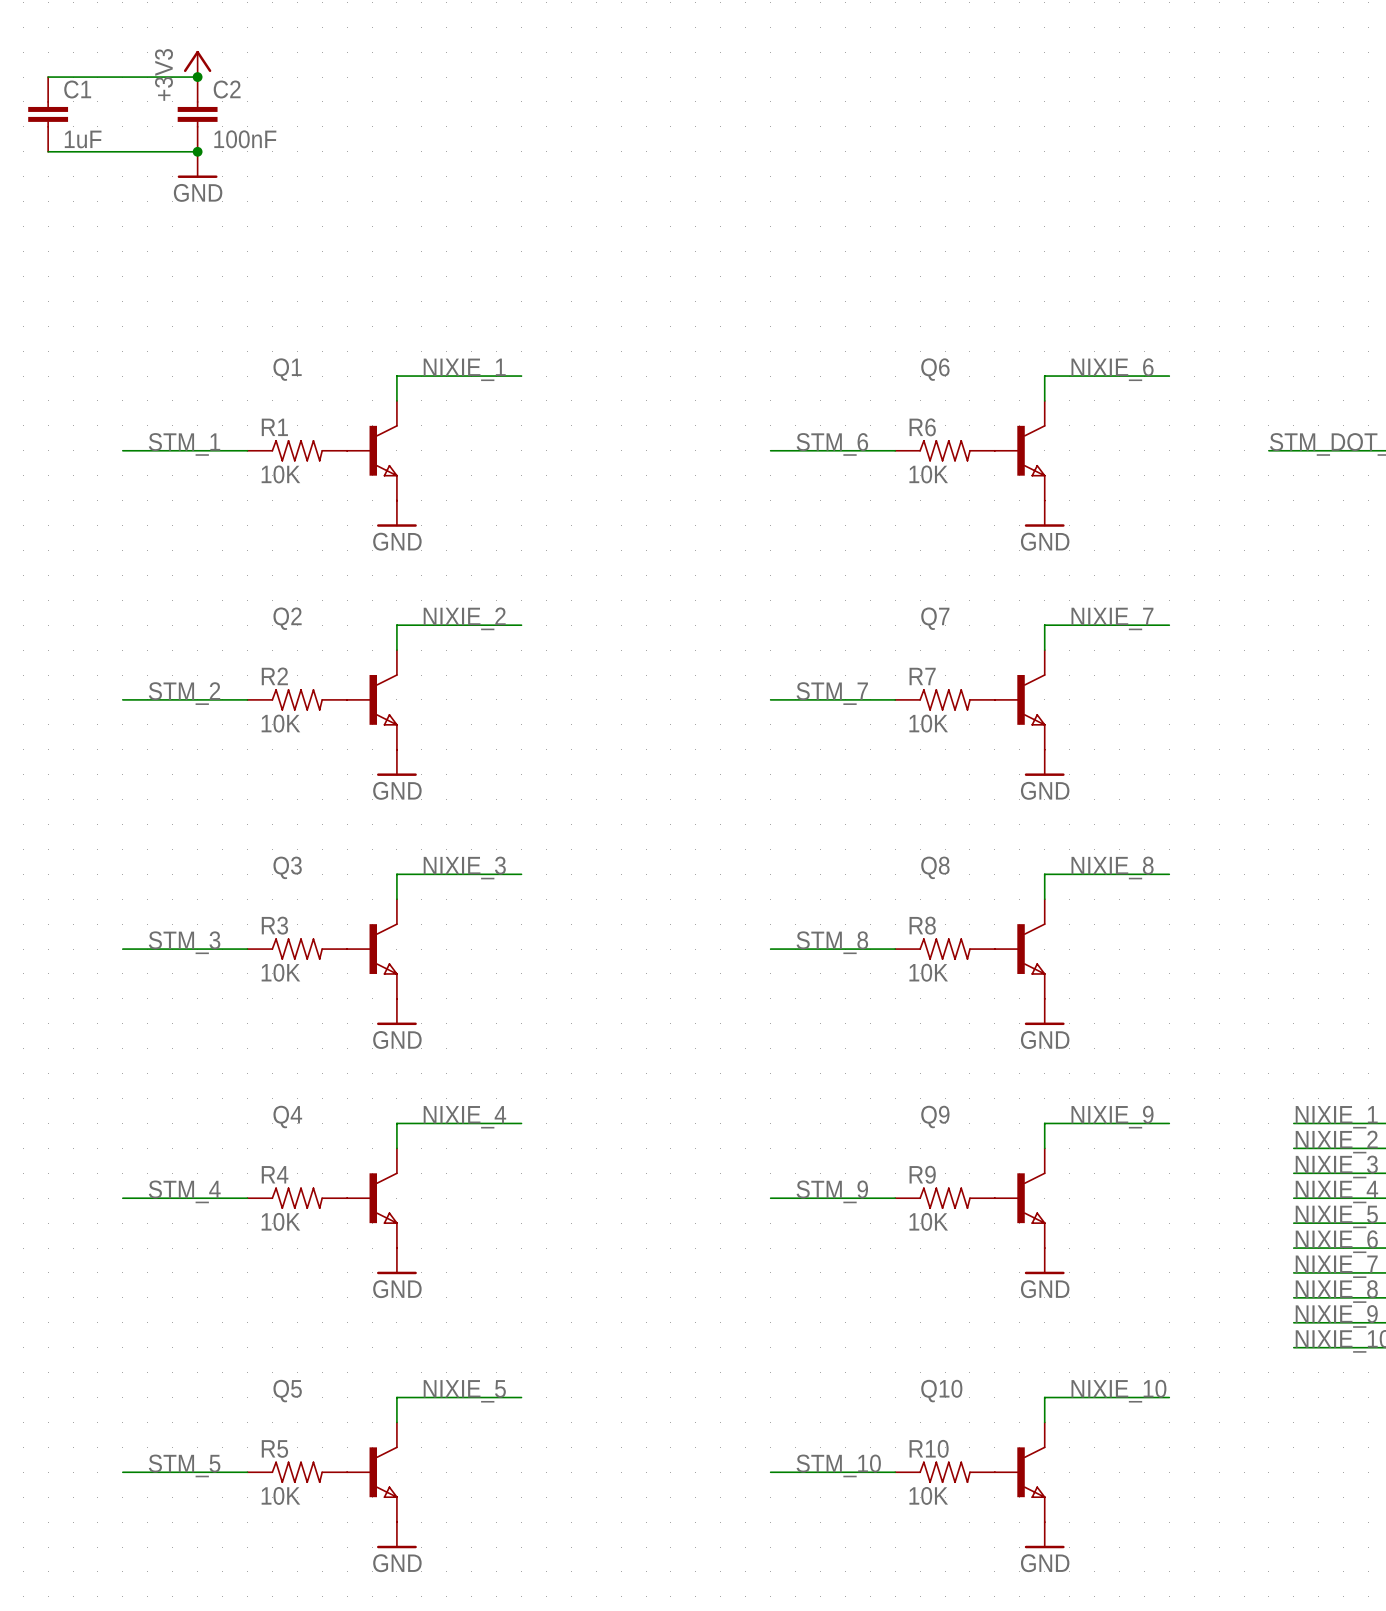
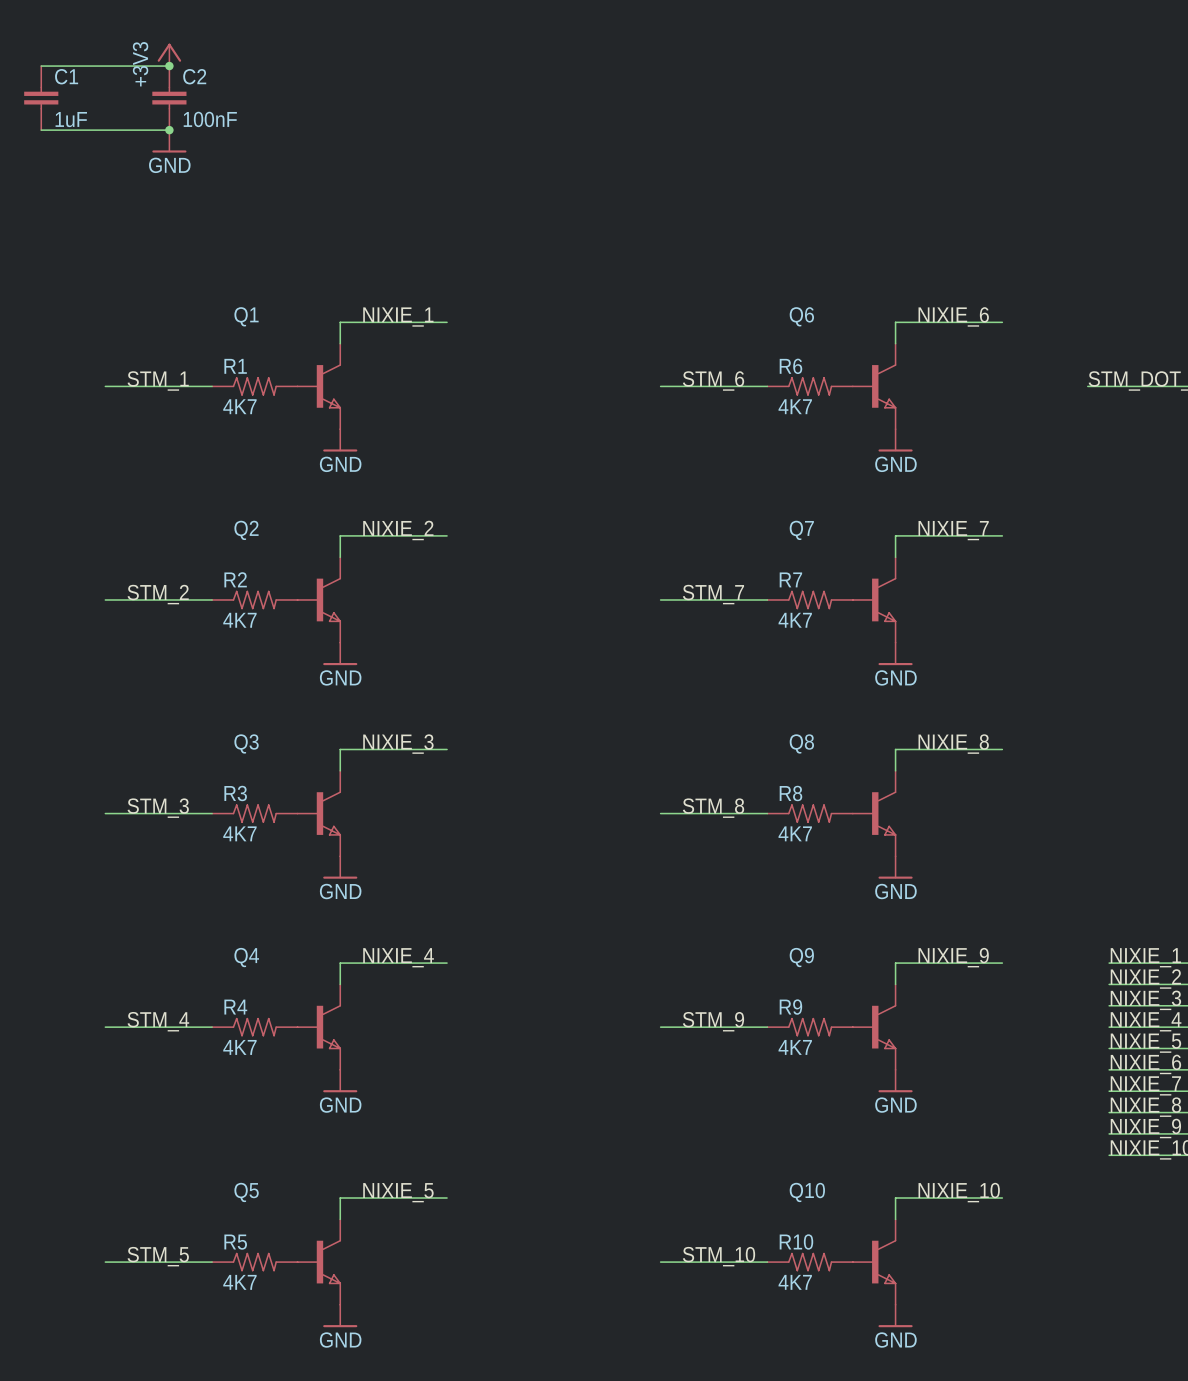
R1 value: 10K (280, 474) -> 4K7 (239, 406)
R6 value: 10K (928, 474) -> 4K7 (795, 406)
R2 value: 10K (280, 723) -> 4K7 (239, 620)
R7 value: 10K (928, 723) -> 4K7 (795, 620)
R3 value: 10K (280, 972) -> 4K7 (239, 833)
R8 value: 10K (928, 972) -> 4K7 (795, 833)
R4 value: 10K (280, 1221) -> 4K7 (239, 1047)
R9 value: 10K (928, 1221) -> 4K7 (795, 1047)
R5 value: 10K (280, 1495) -> 4K7 (239, 1282)
R10 value: 10K (928, 1495) -> 4K7 (795, 1282)

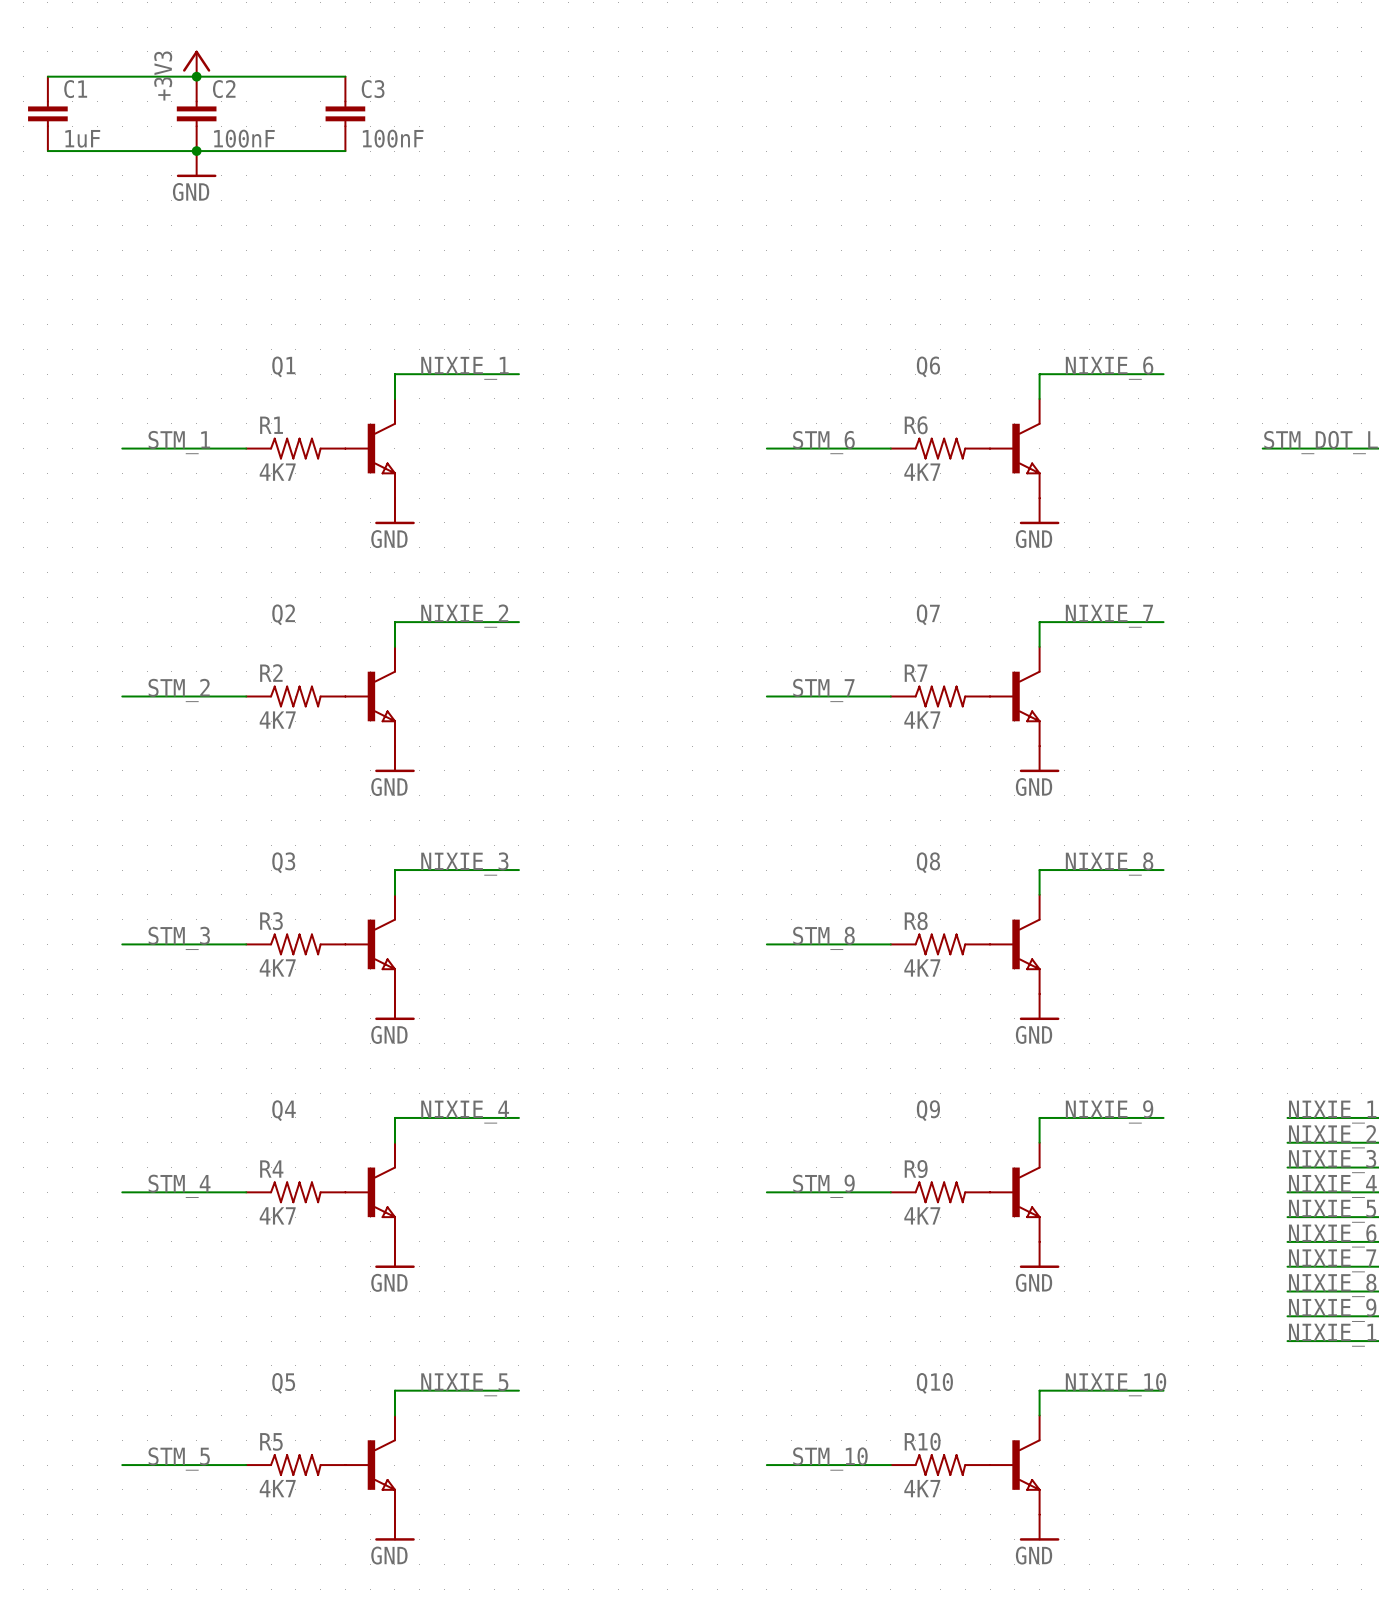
wire: none -> (196, 76) (345, 76)
C3: none -> 100nF (345, 113)
wire: none -> (196, 151) (345, 151)

